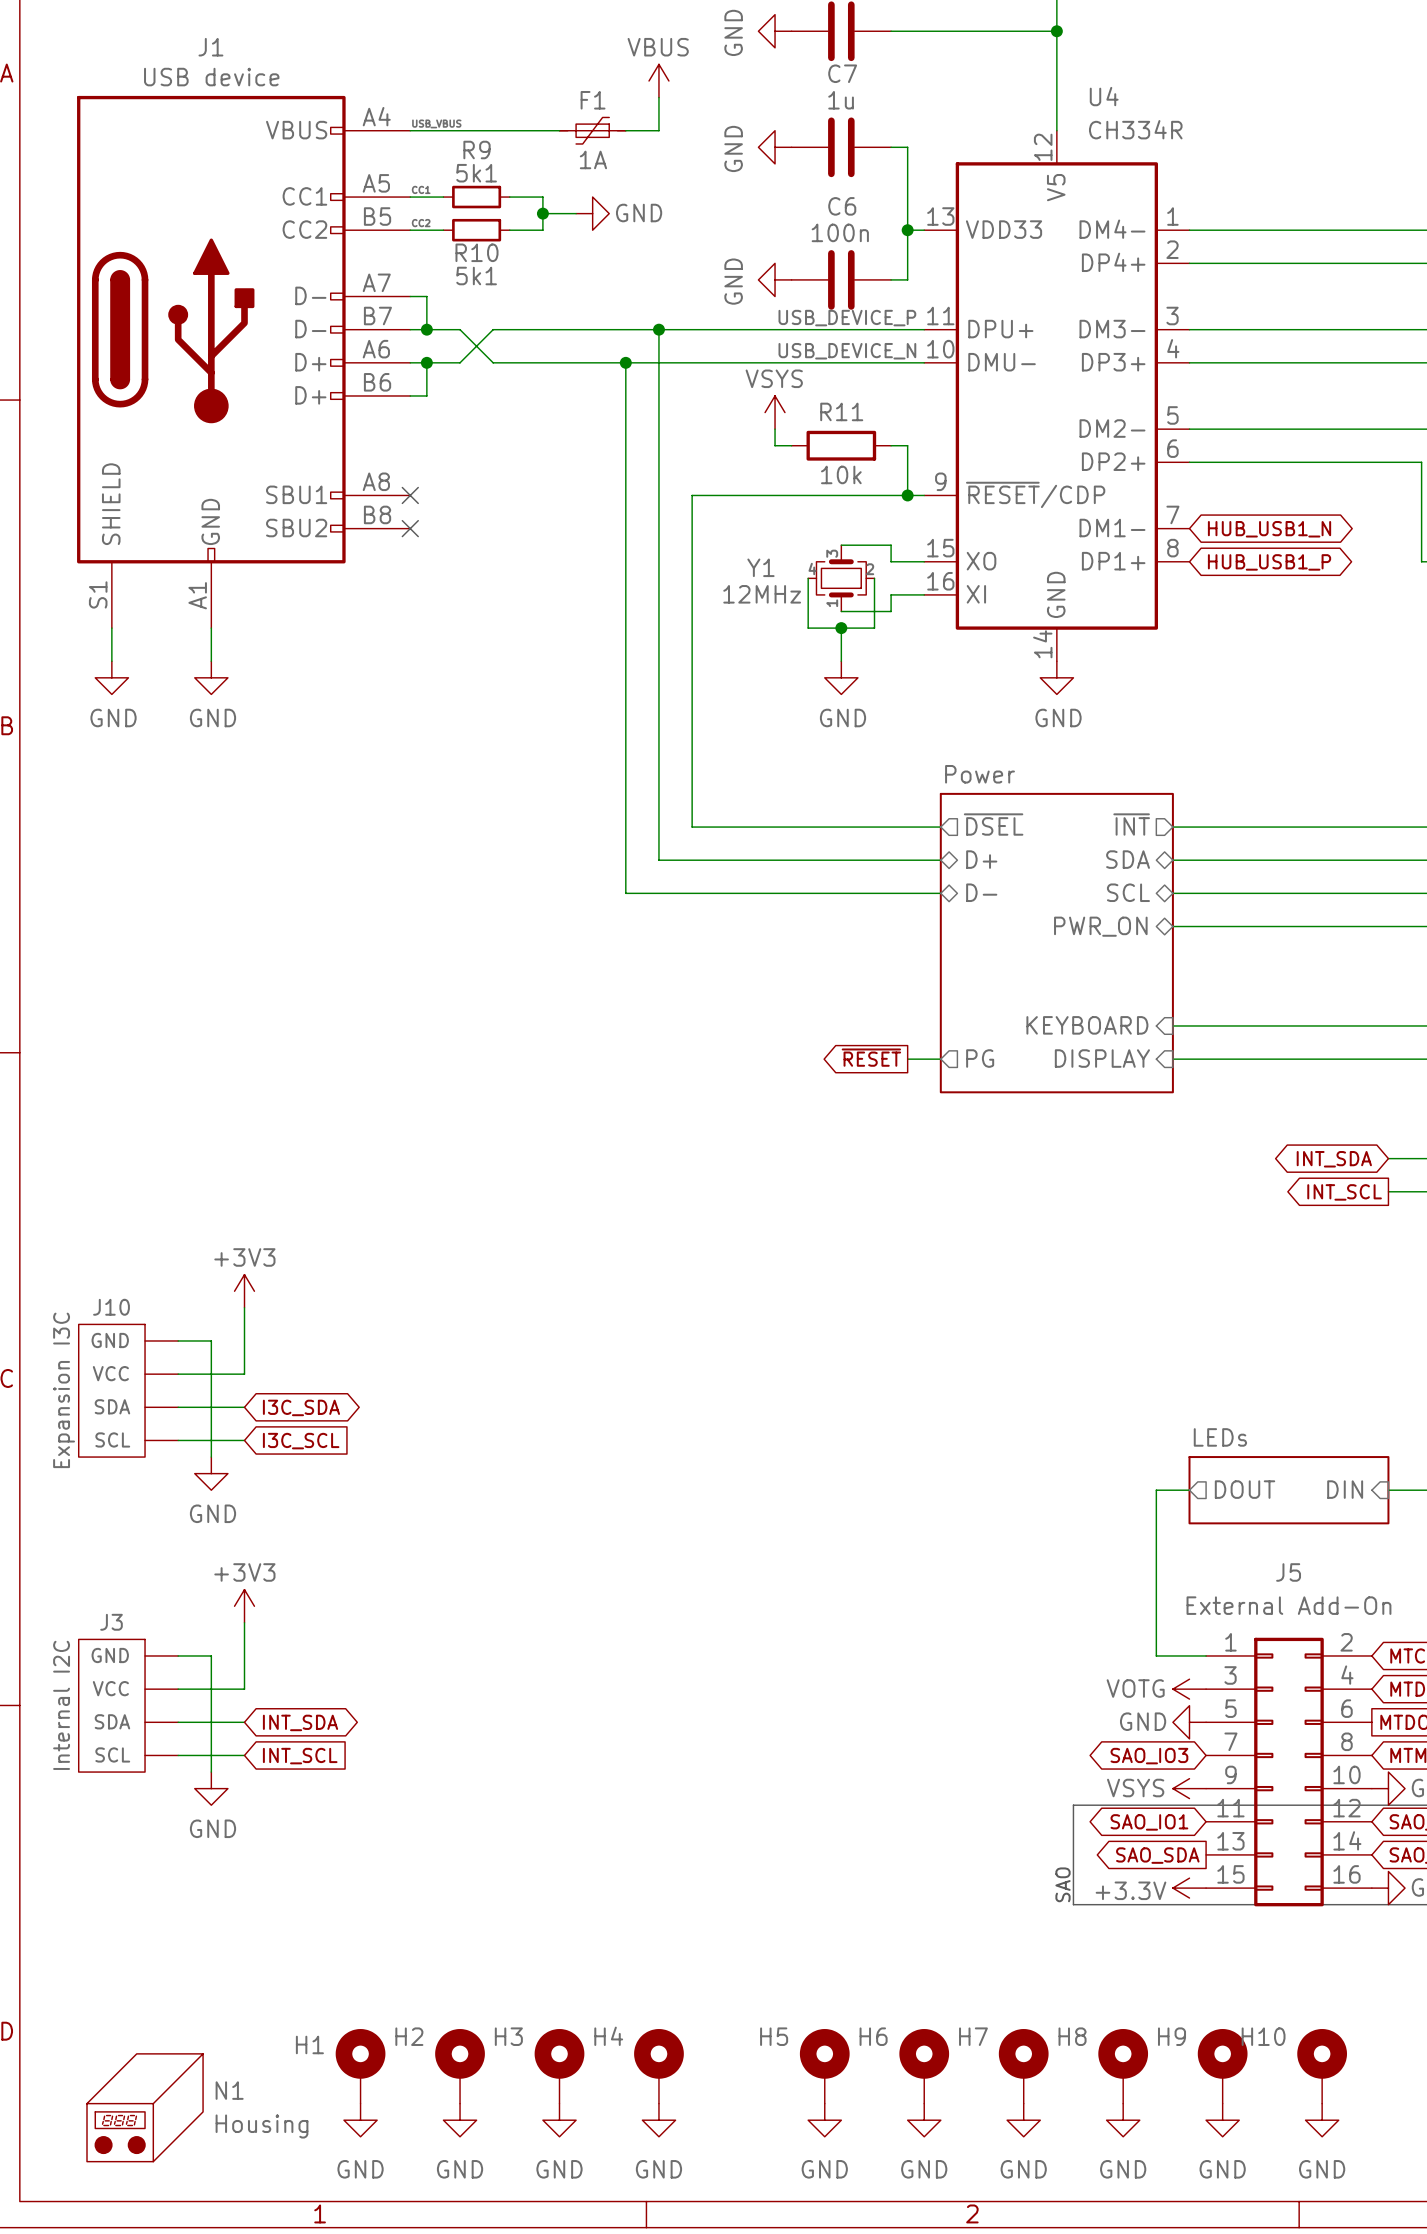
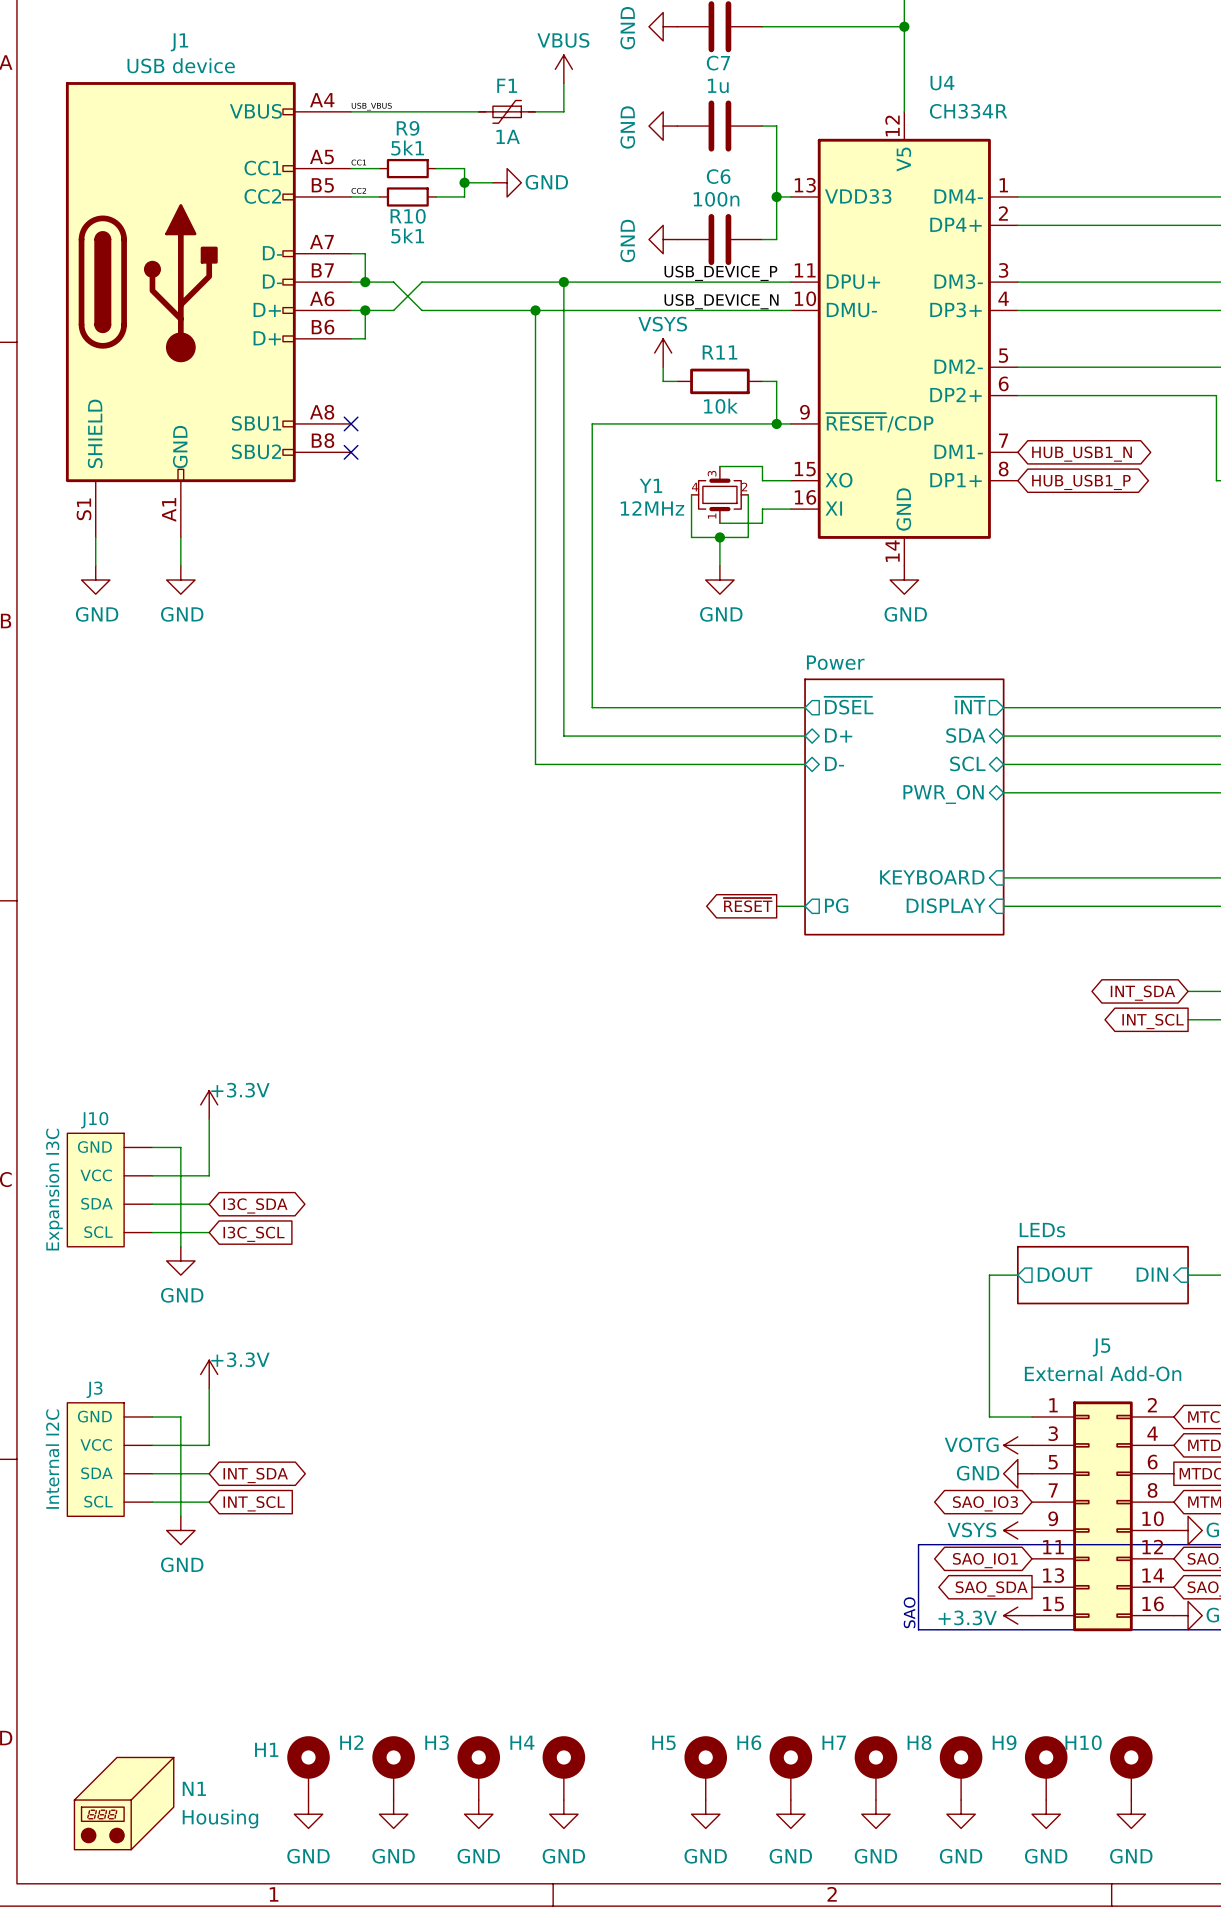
power symbol: +3V3 (244, 1291) -> +3.3V (209, 1104)
power symbol: +3V3 (244, 1606) -> +3.3V (209, 1374)

